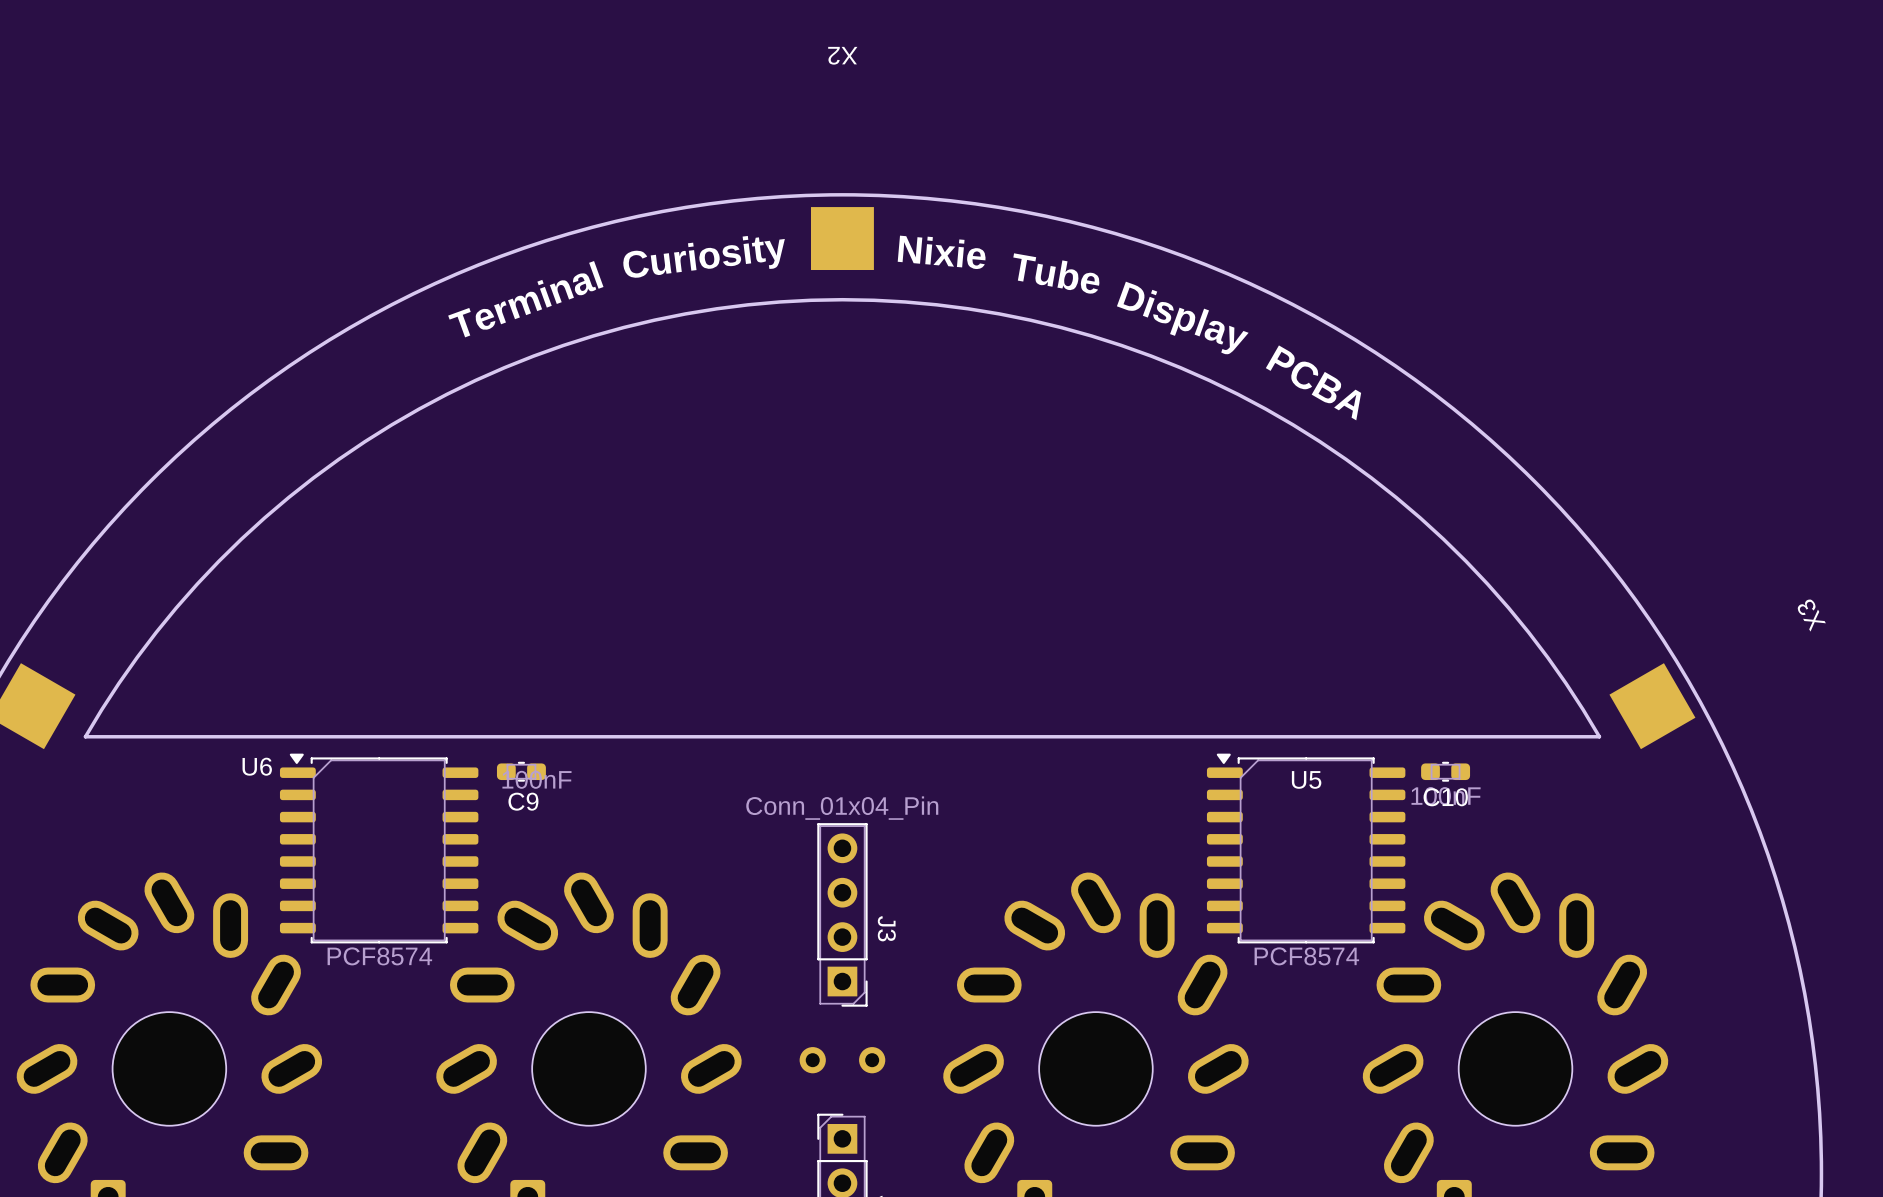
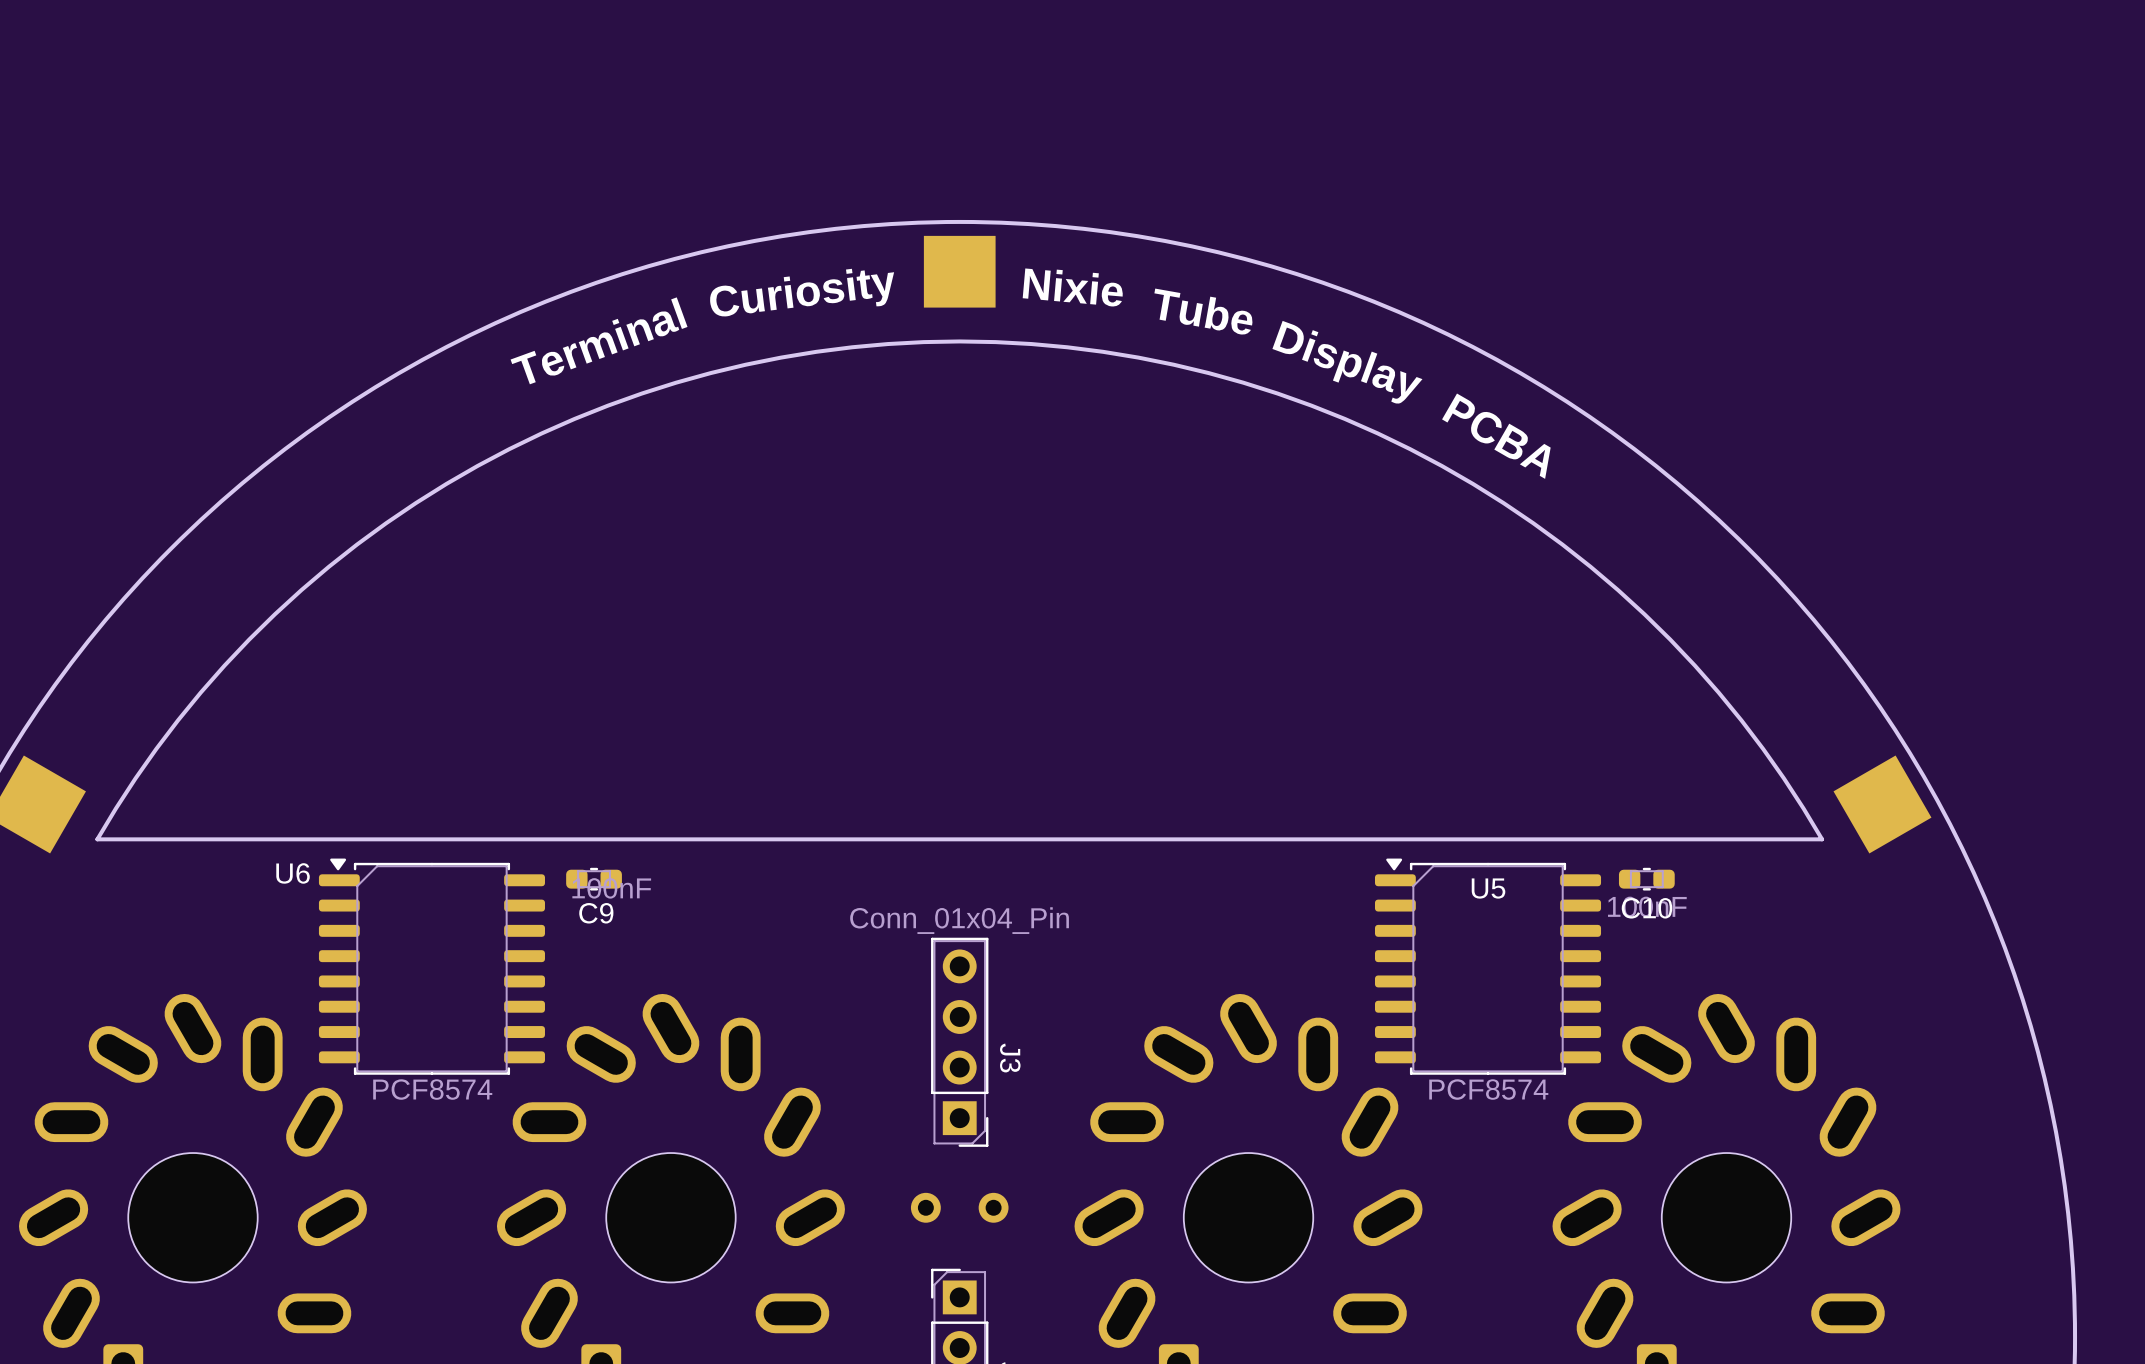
X2 name: X2 (842, 55) -> none
X3 name: X3 (1811, 615) -> none

